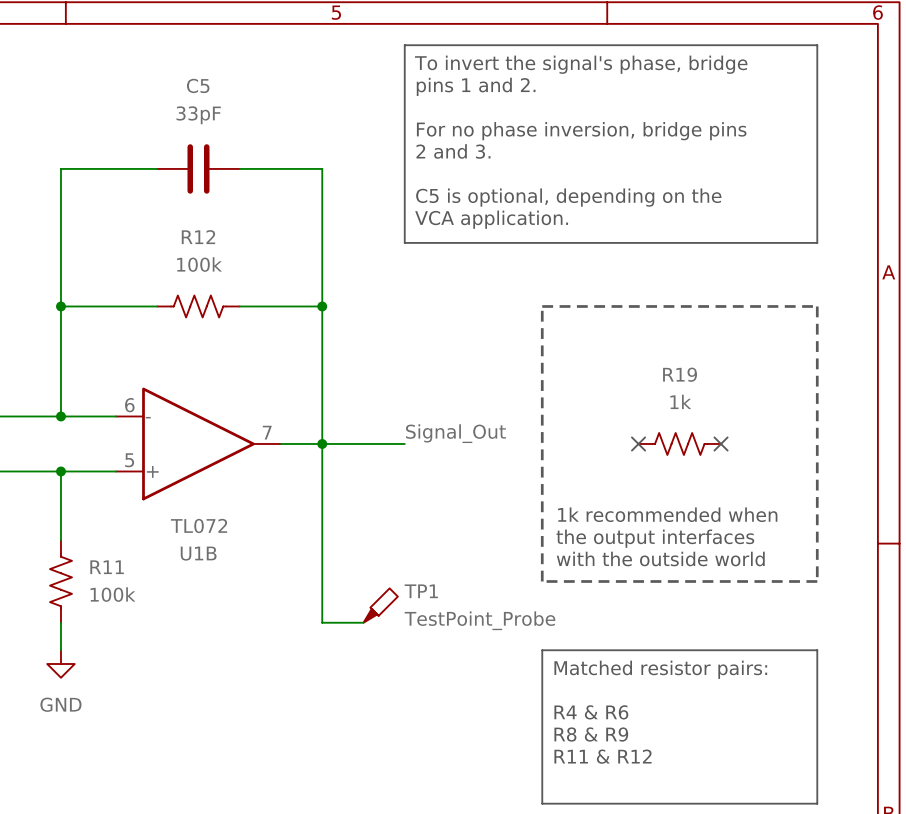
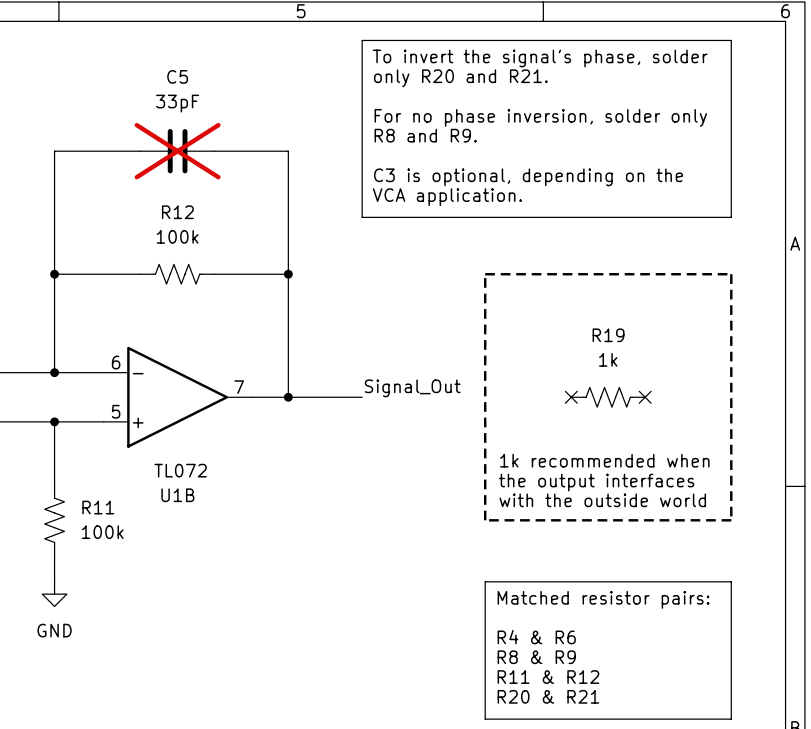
text: To invert the signal's phase, bridge (581, 64) -> To invert the signal's phase, solder (540, 58)
text: pins 1 and 2. (476, 86) -> only R20 and R21. (460, 78)
text: For no phase inversion, bridge pins (581, 131) -> For no phase inversion, solder only (540, 117)
text: 2 and 3. (453, 151) -> R8 and R9. (425, 135)
C5 do-not-place cross: none -> (177, 151)
text: C5 is optional, depending on the (568, 197) -> C3 is optional, depending on the (528, 177)
wire: (322, 443) (322, 622) (363, 622) -> none
TP1: TestPoint_Probe (380, 605) -> none
text: none -> R20 & R21 (548, 696)

